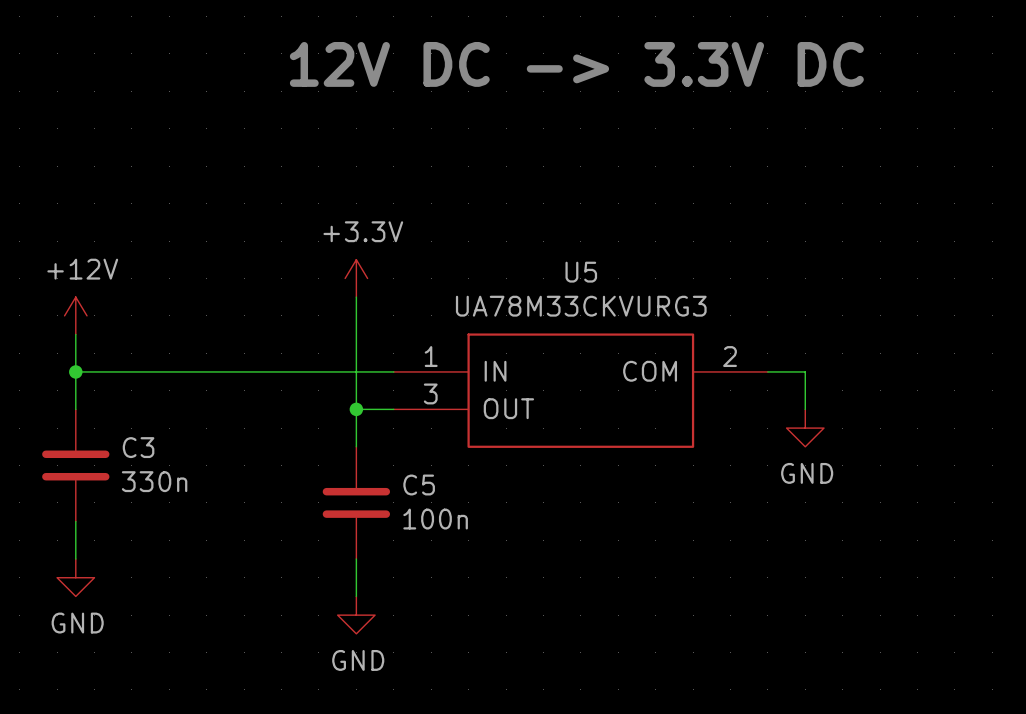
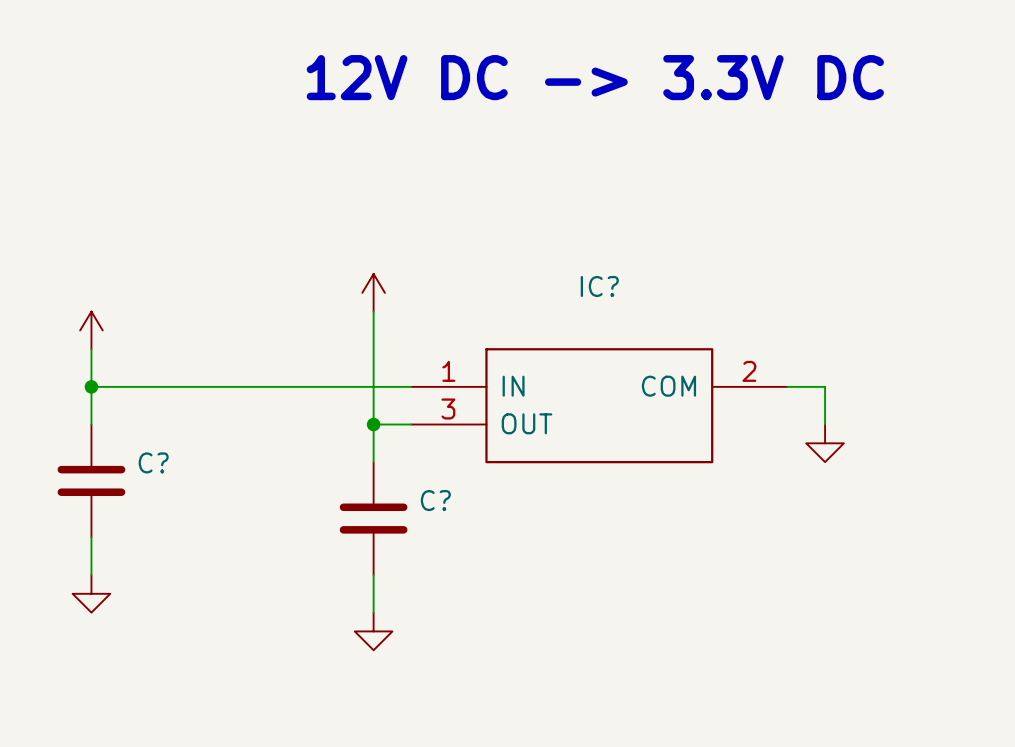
power symbol text: +3.3V (363, 231) -> none
power symbol text: +12V (82, 269) -> none
U5 name: U5 (581, 272) -> IC? (599, 286)
U5 value: UA78M33CKVURG3 (581, 306) -> none
C3 name: C3 (138, 447) -> C? (153, 462)
power symbol text: GND (807, 473) -> none
C3 value: 330n (154, 481) -> none
C5 name: C5 (419, 485) -> C? (435, 500)
C5 value: 100n (435, 519) -> none
power symbol text: GND (77, 623) -> none
power symbol text: GND (358, 660) -> none

